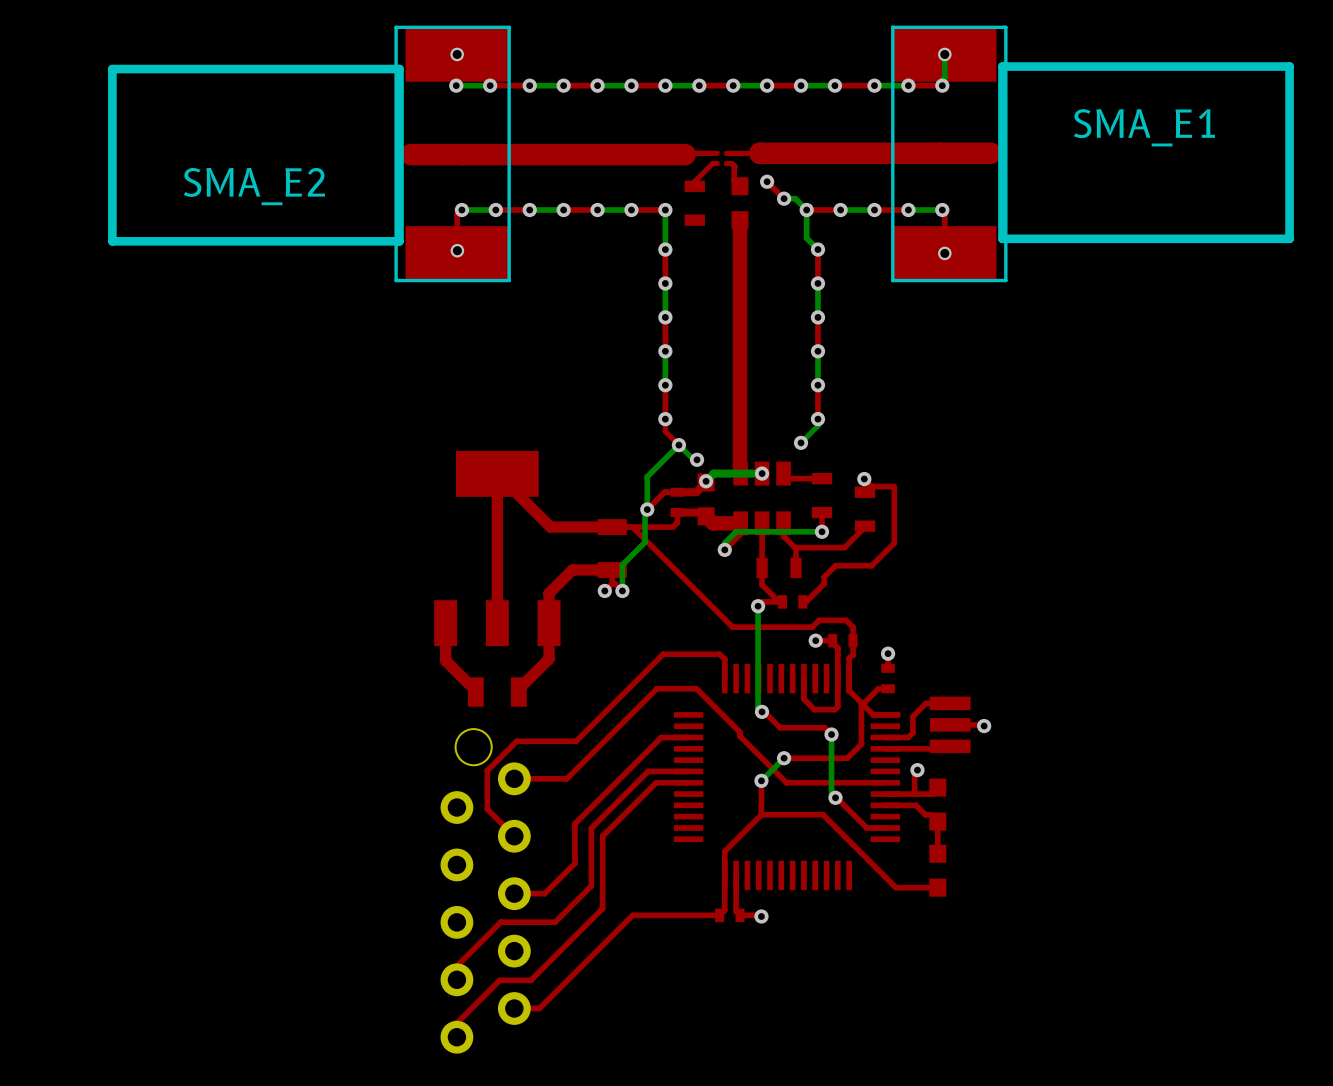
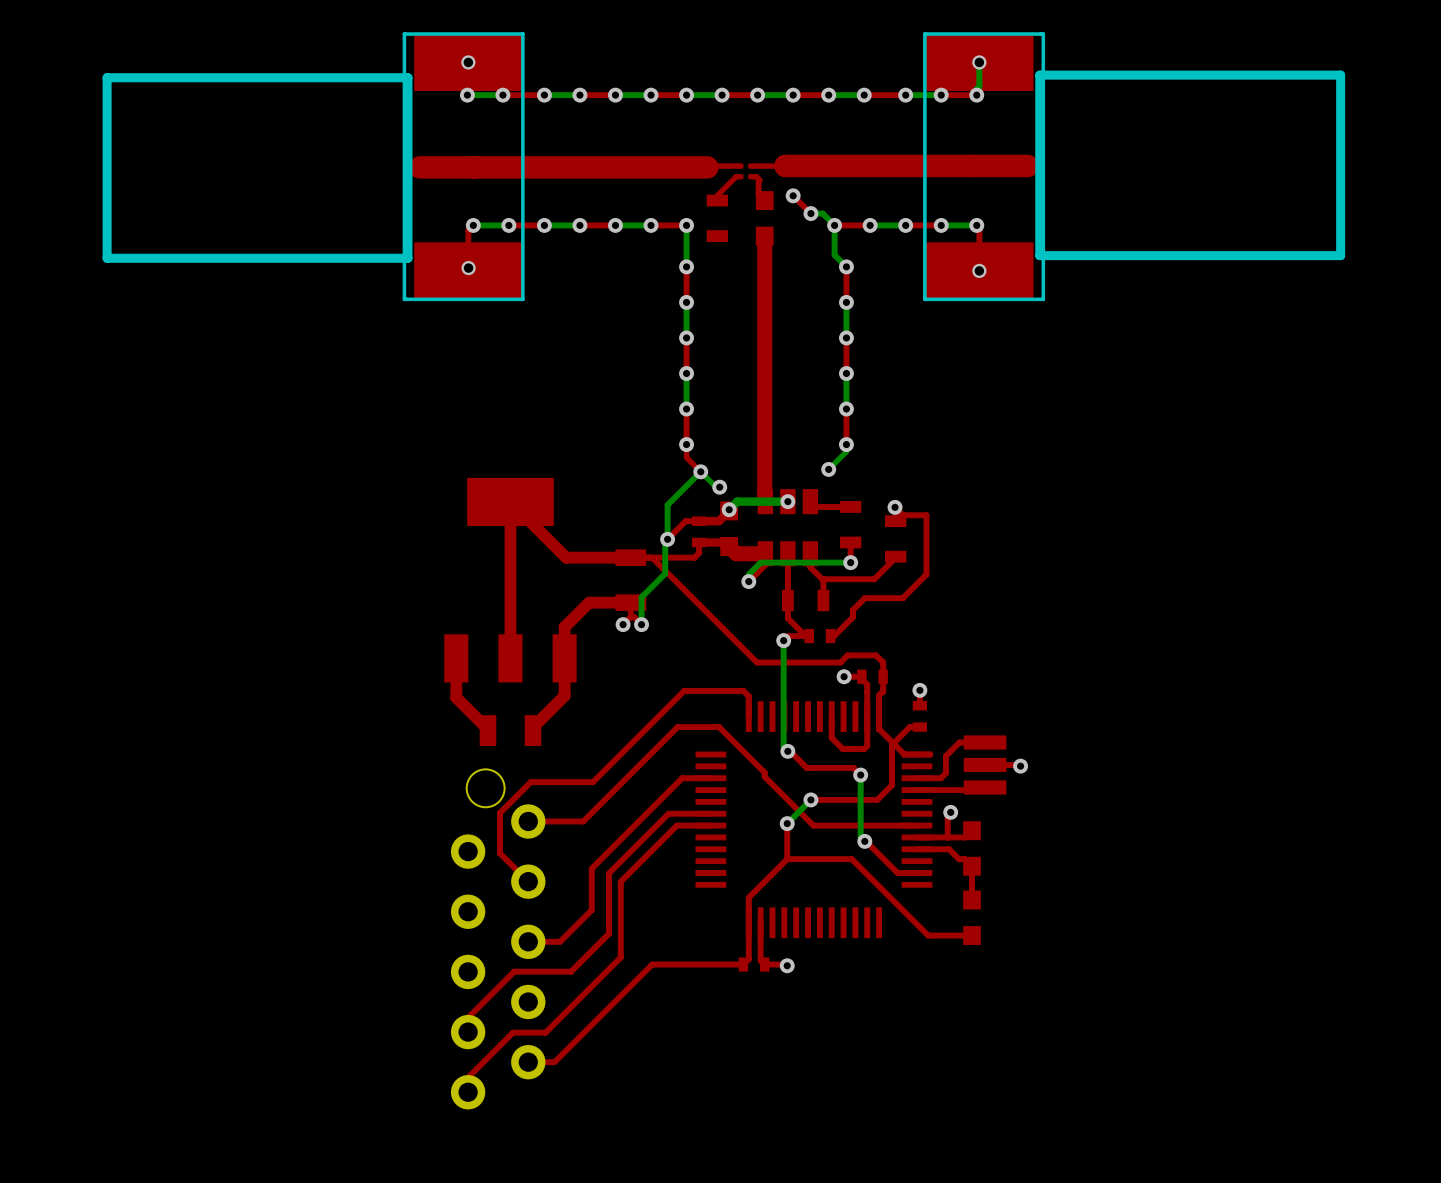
SMA_E1 name: SMA_E1 (1144, 127) -> none
SMA_E2 name: SMA_E2 (254, 186) -> none

